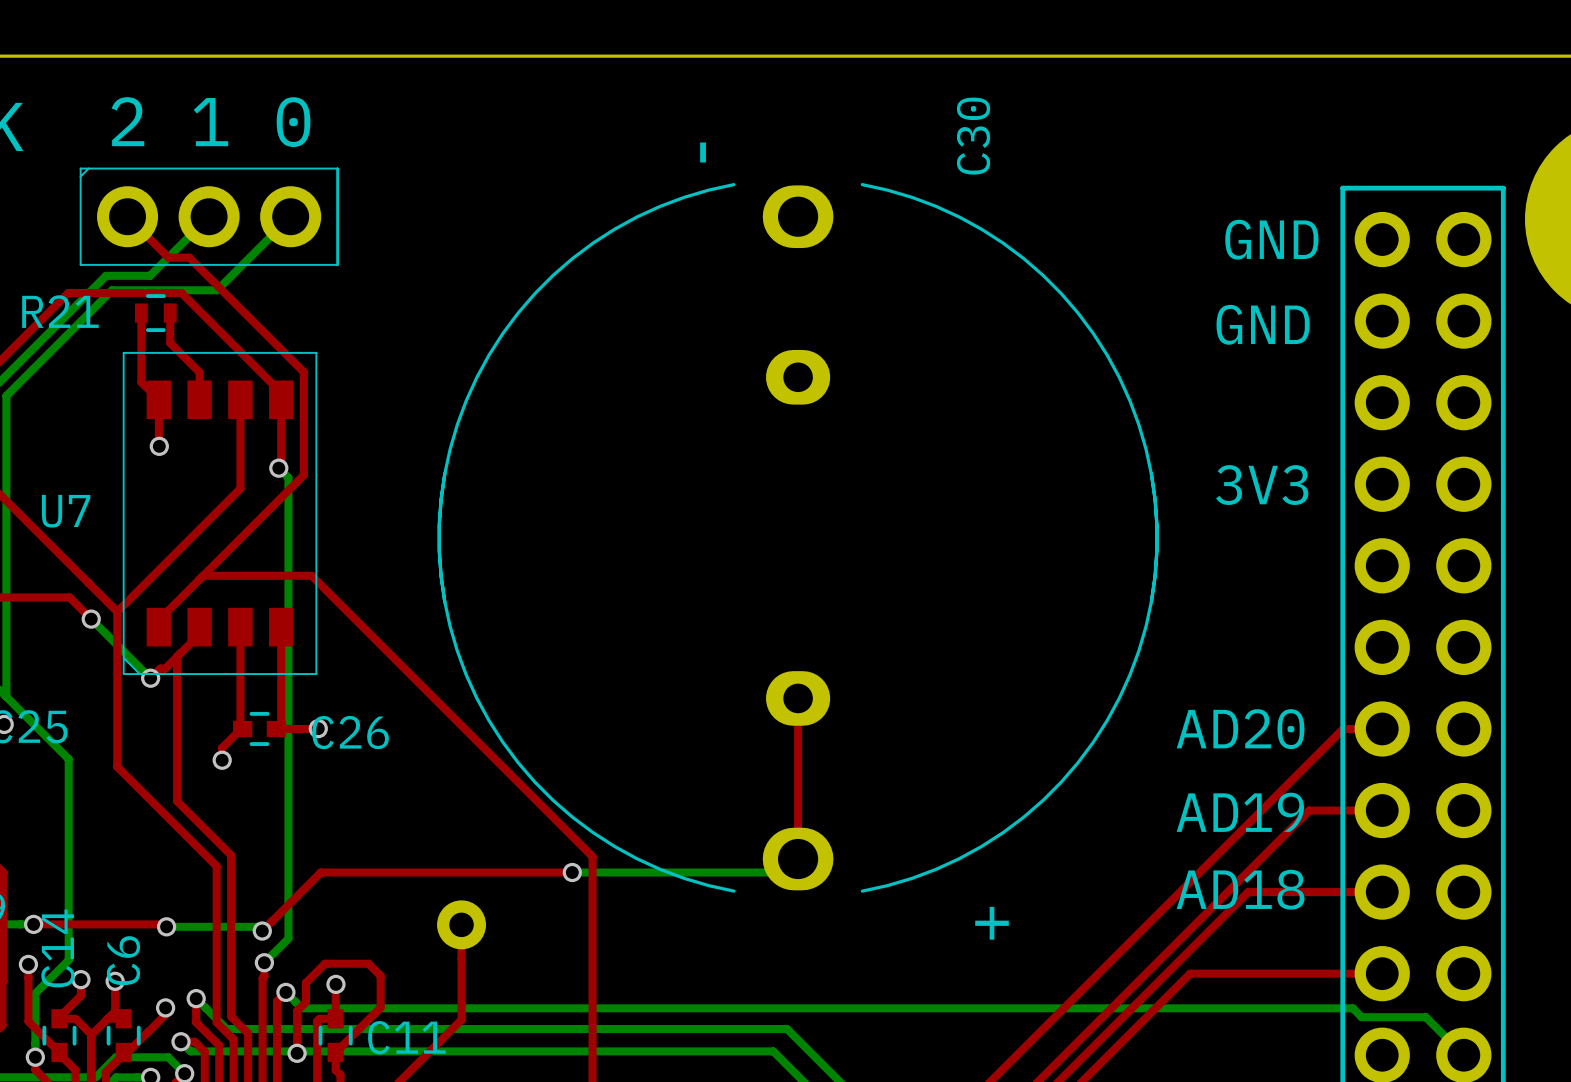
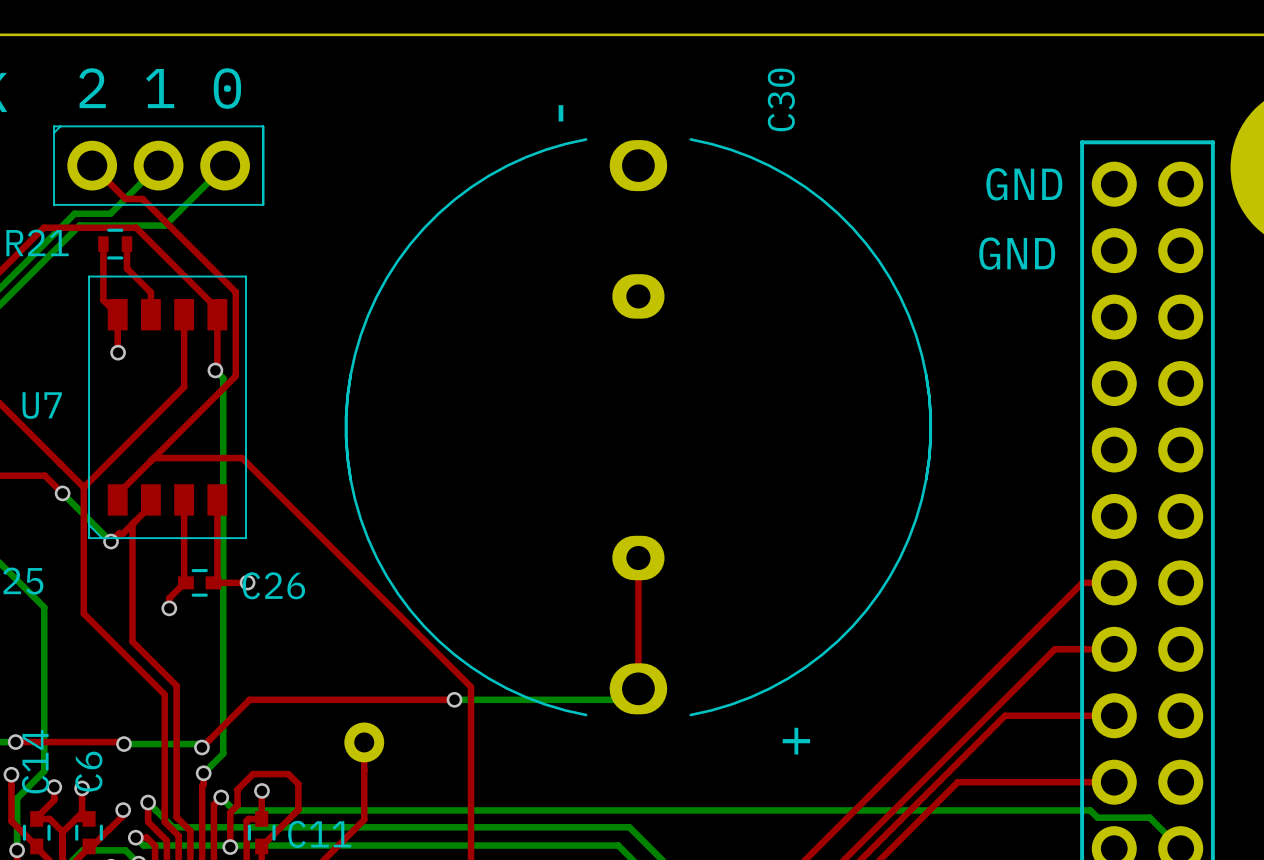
text: 3V3 (1262, 485) -> none
text: AD20 (1240, 729) -> none
text: AD19 (1240, 812) -> none
text: AD18 (1240, 889) -> none

